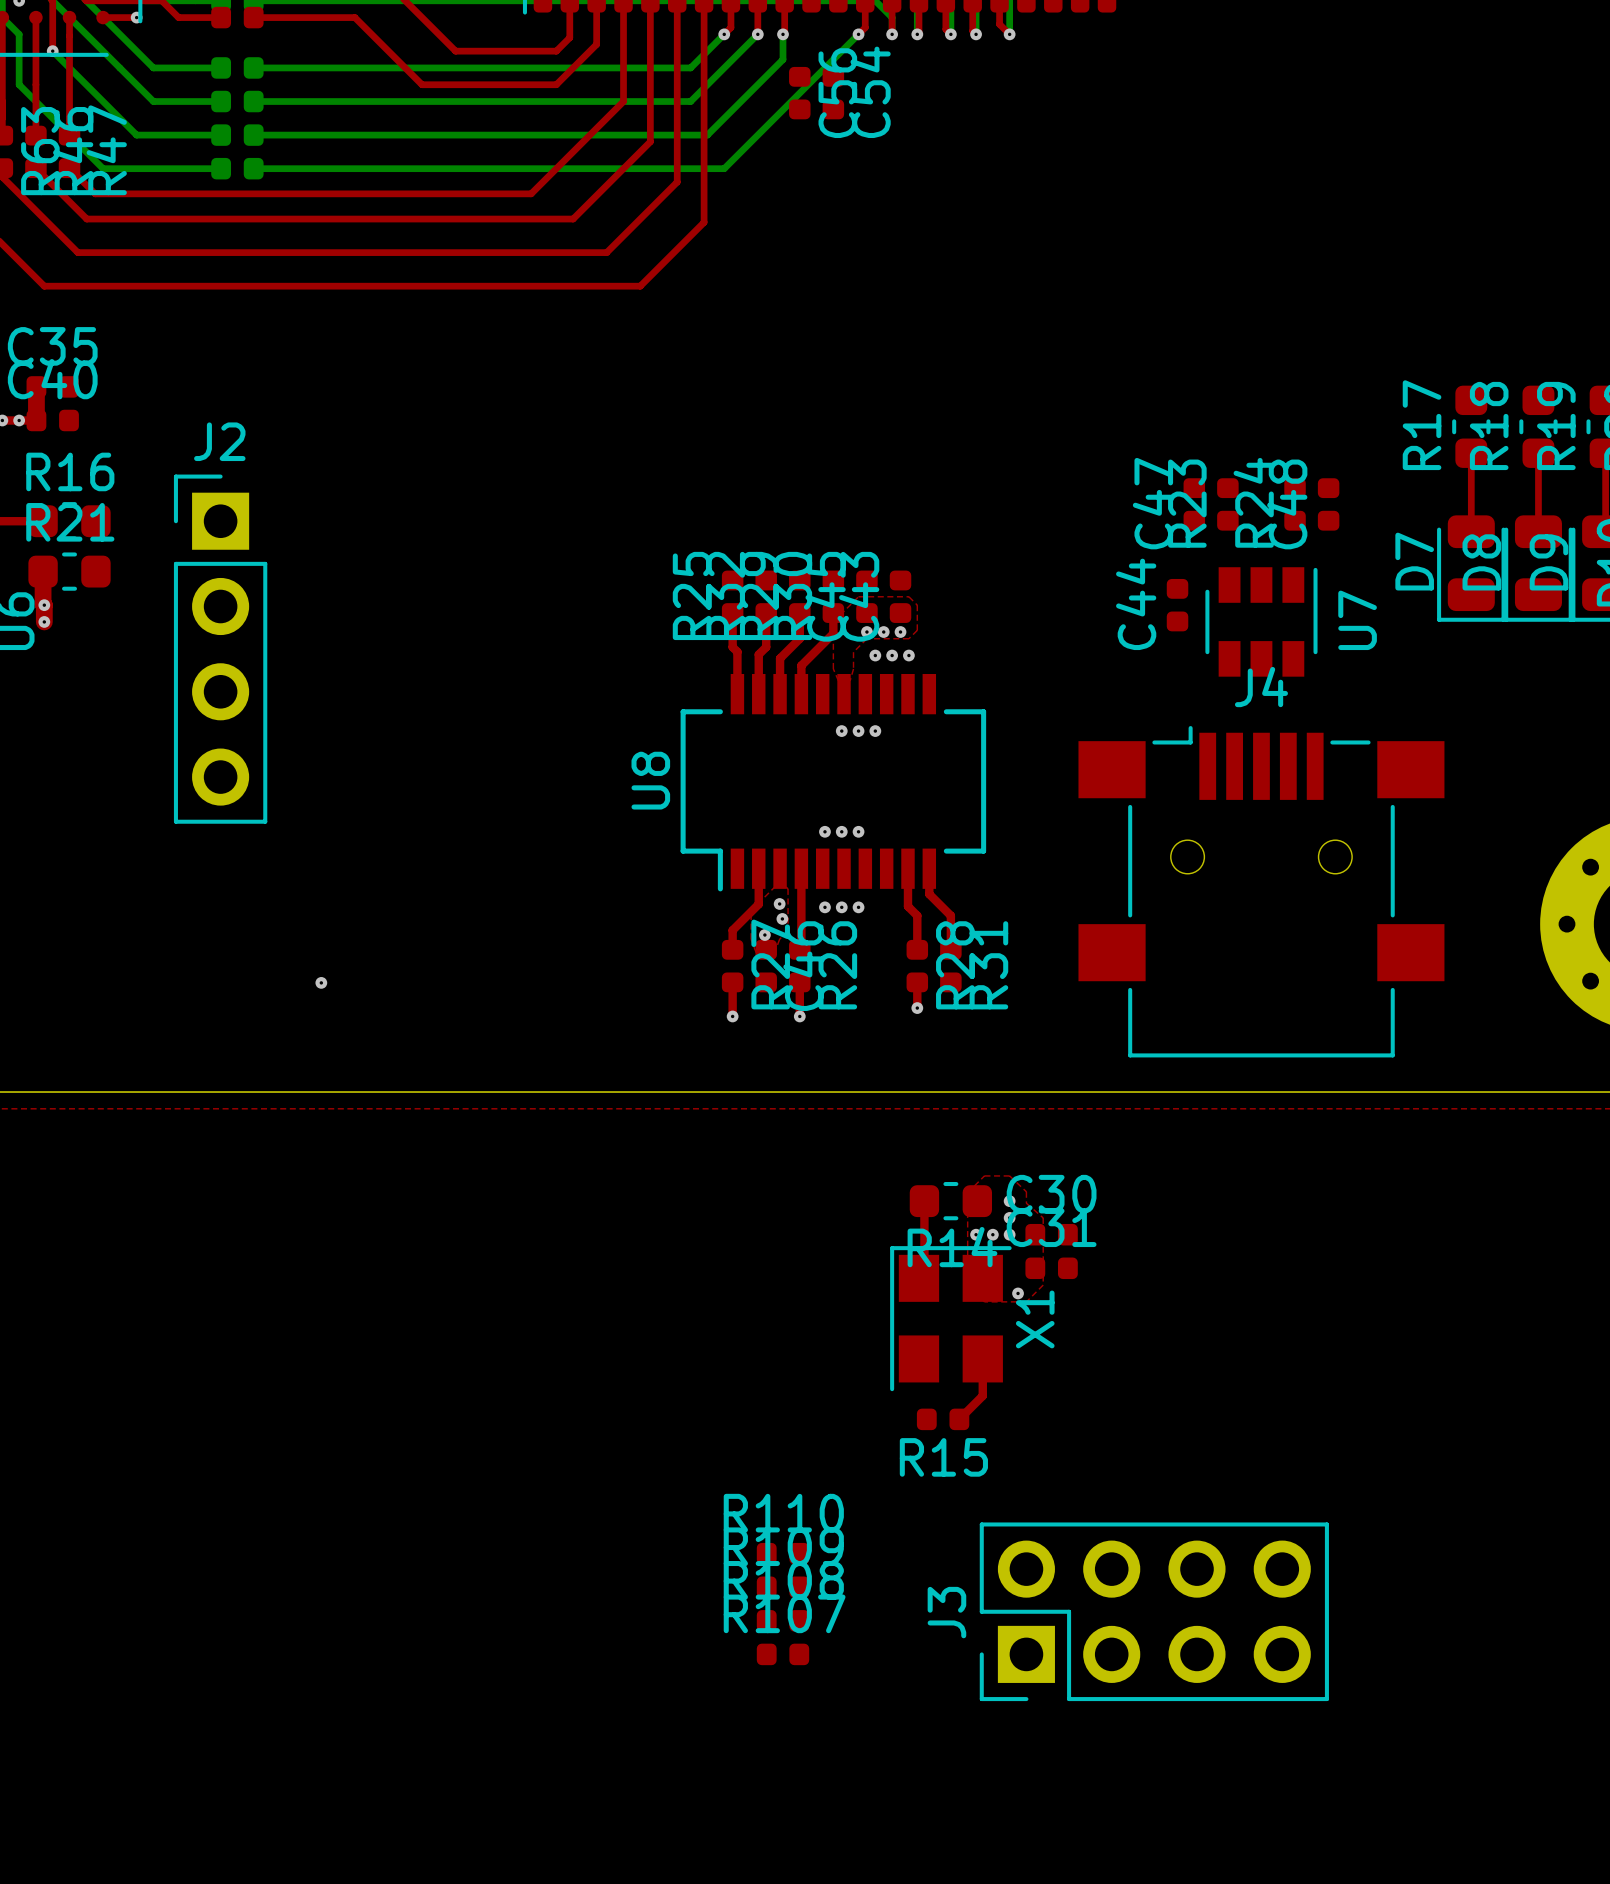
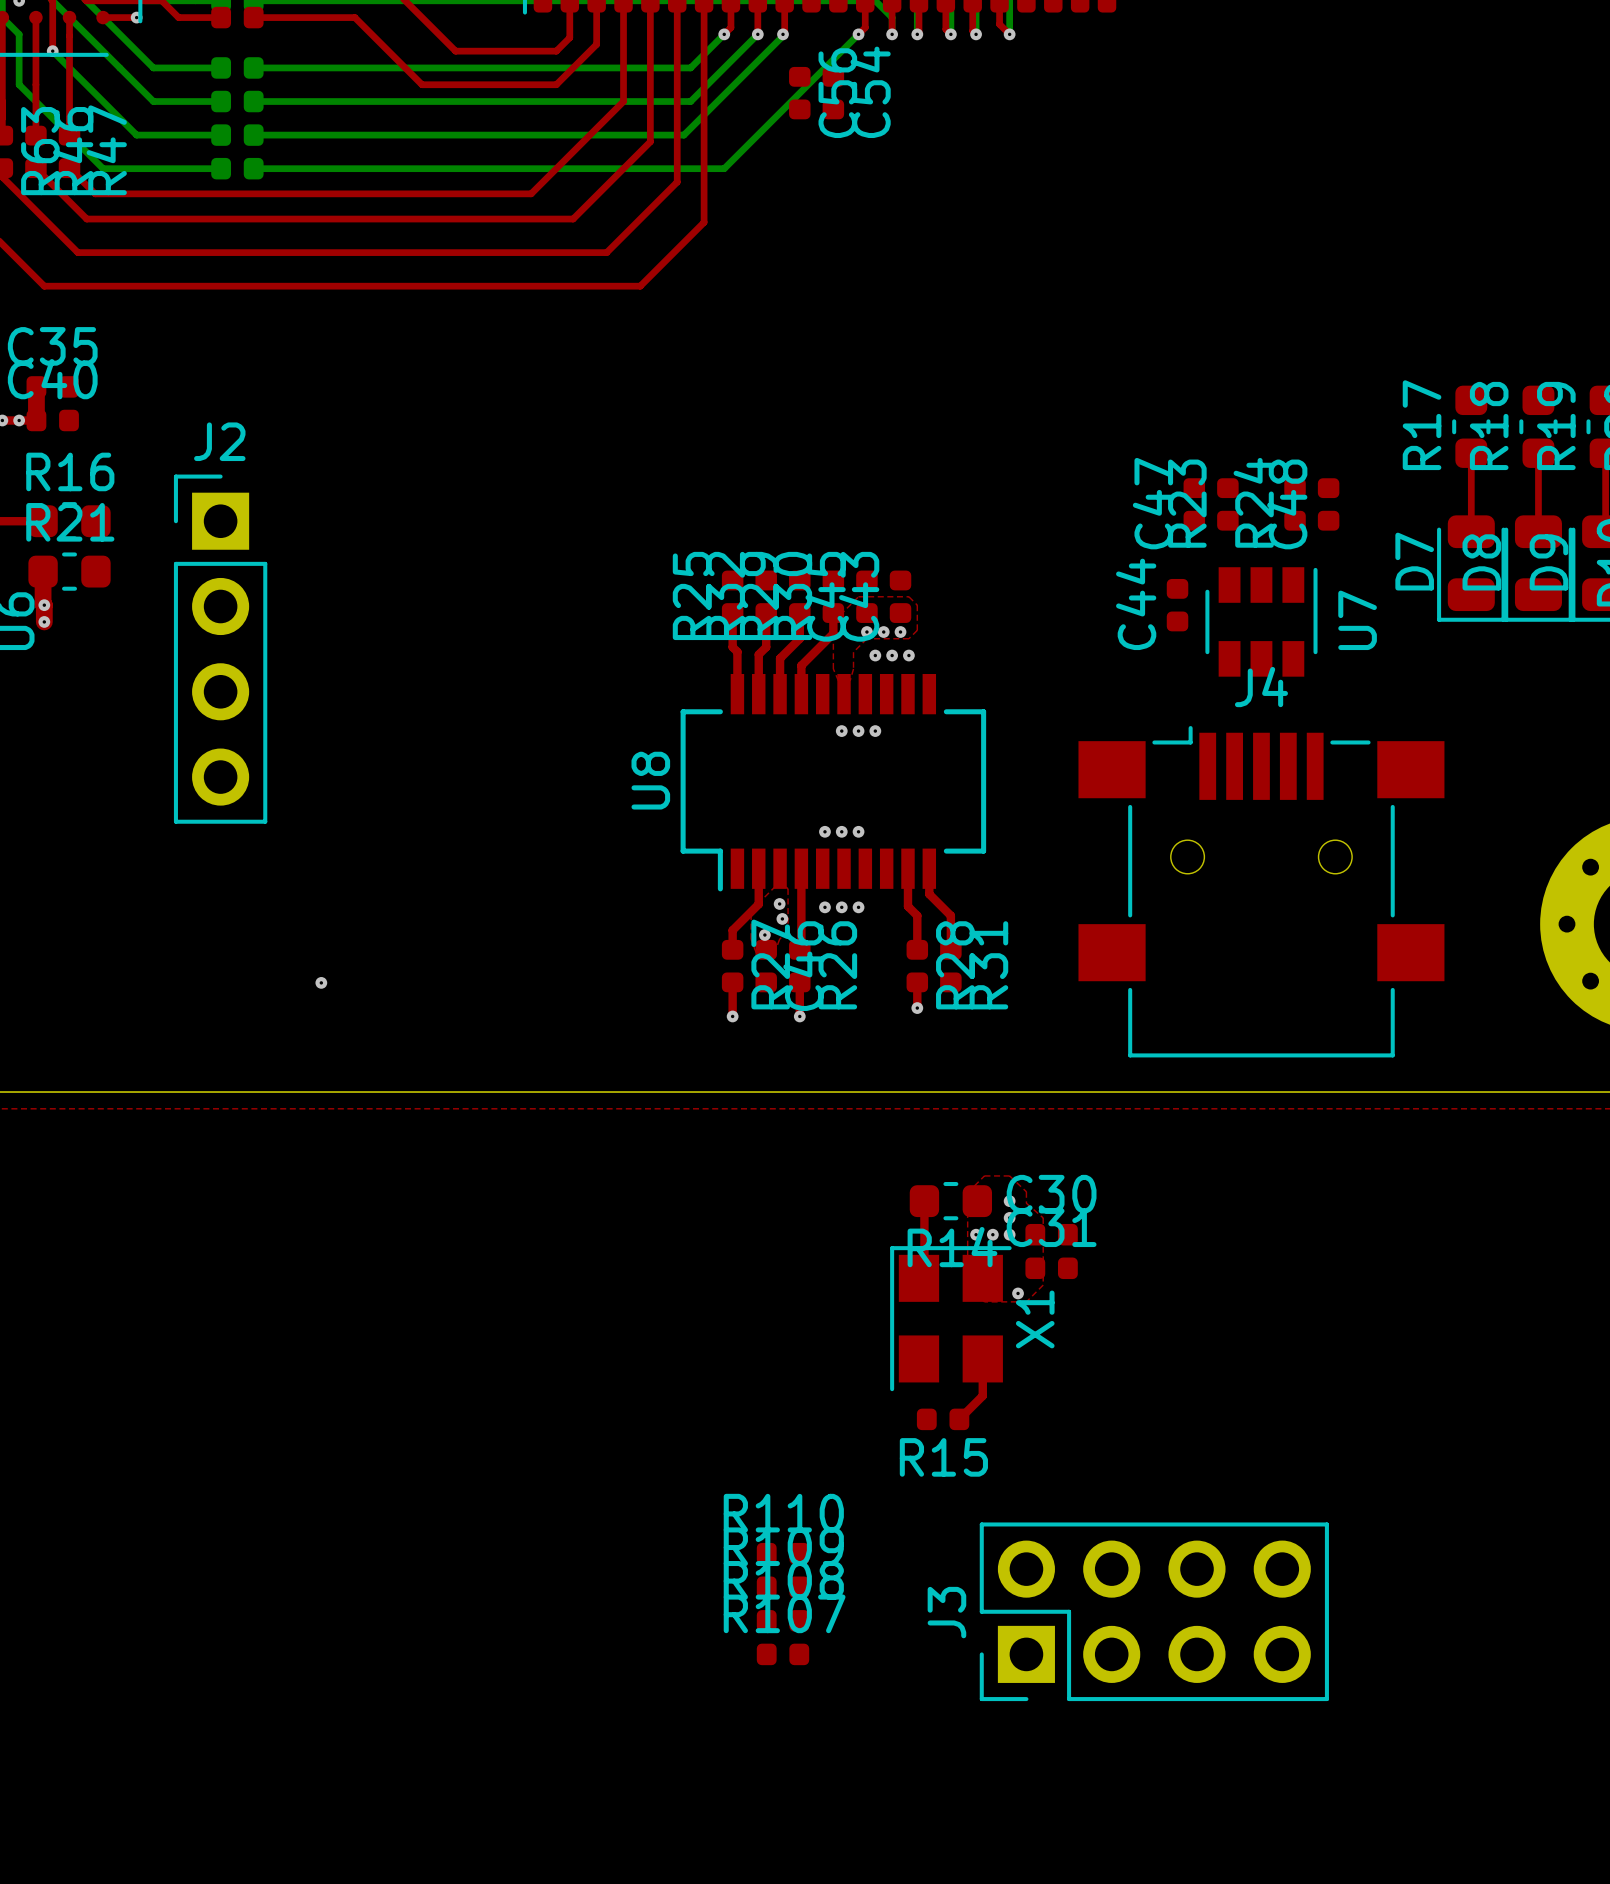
bottom track: (783, 34) (783, 59) (707, 135) (683, 135) -> (784, 34) (683, 135)

